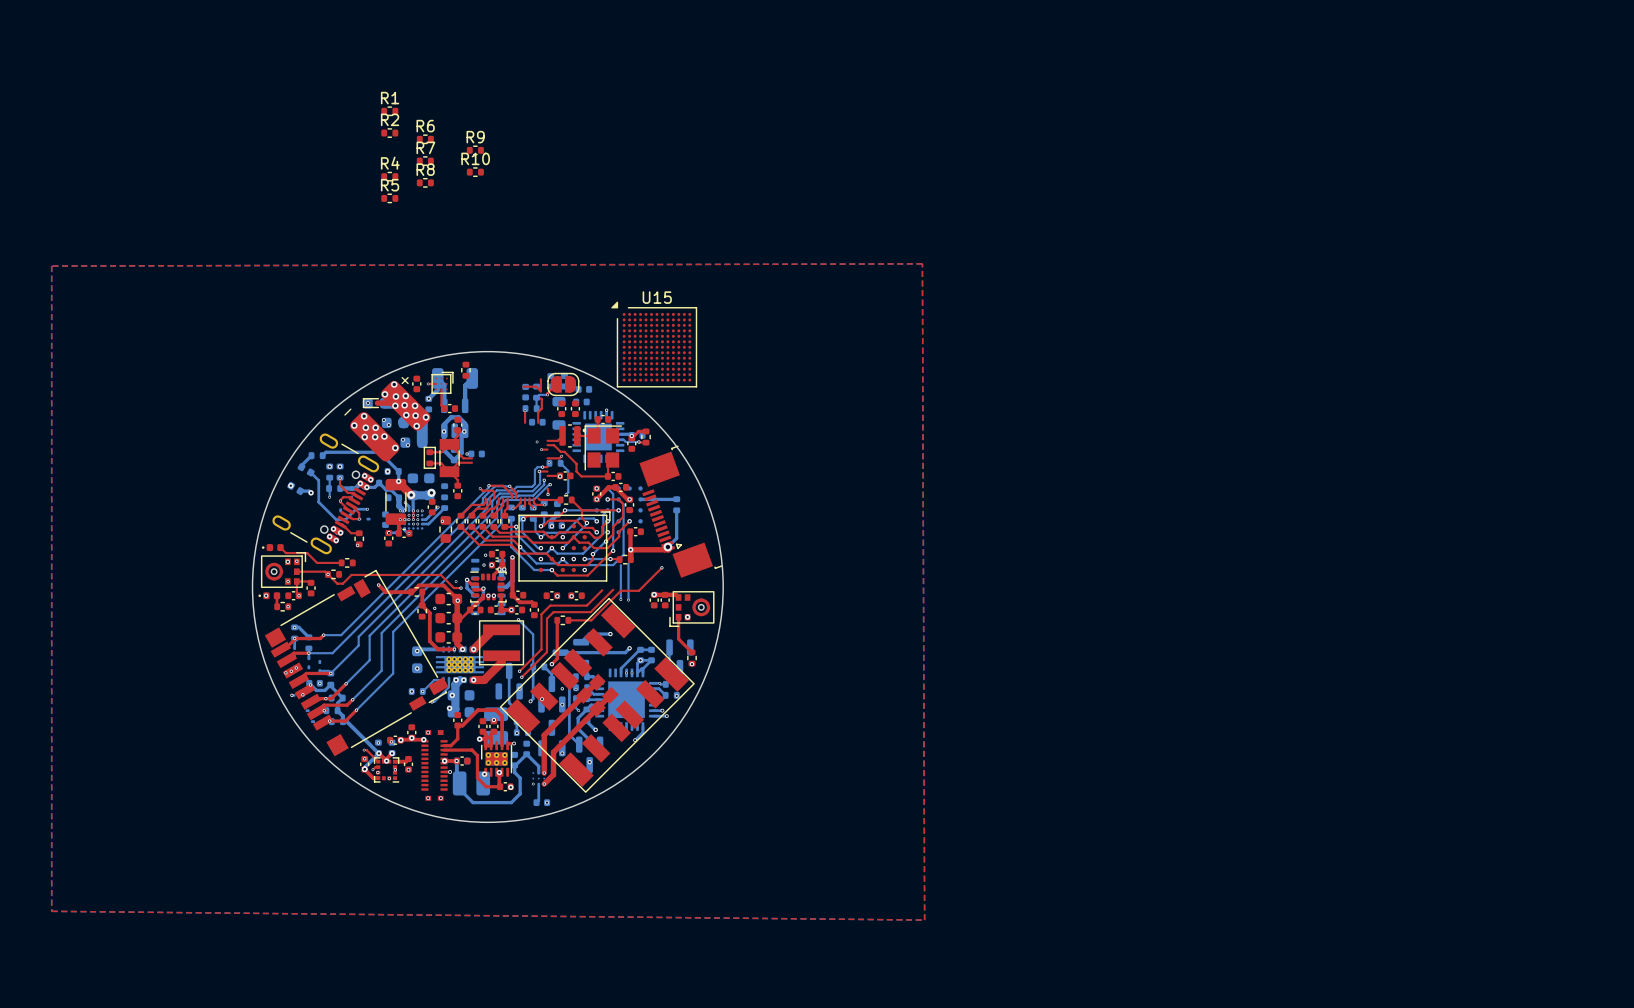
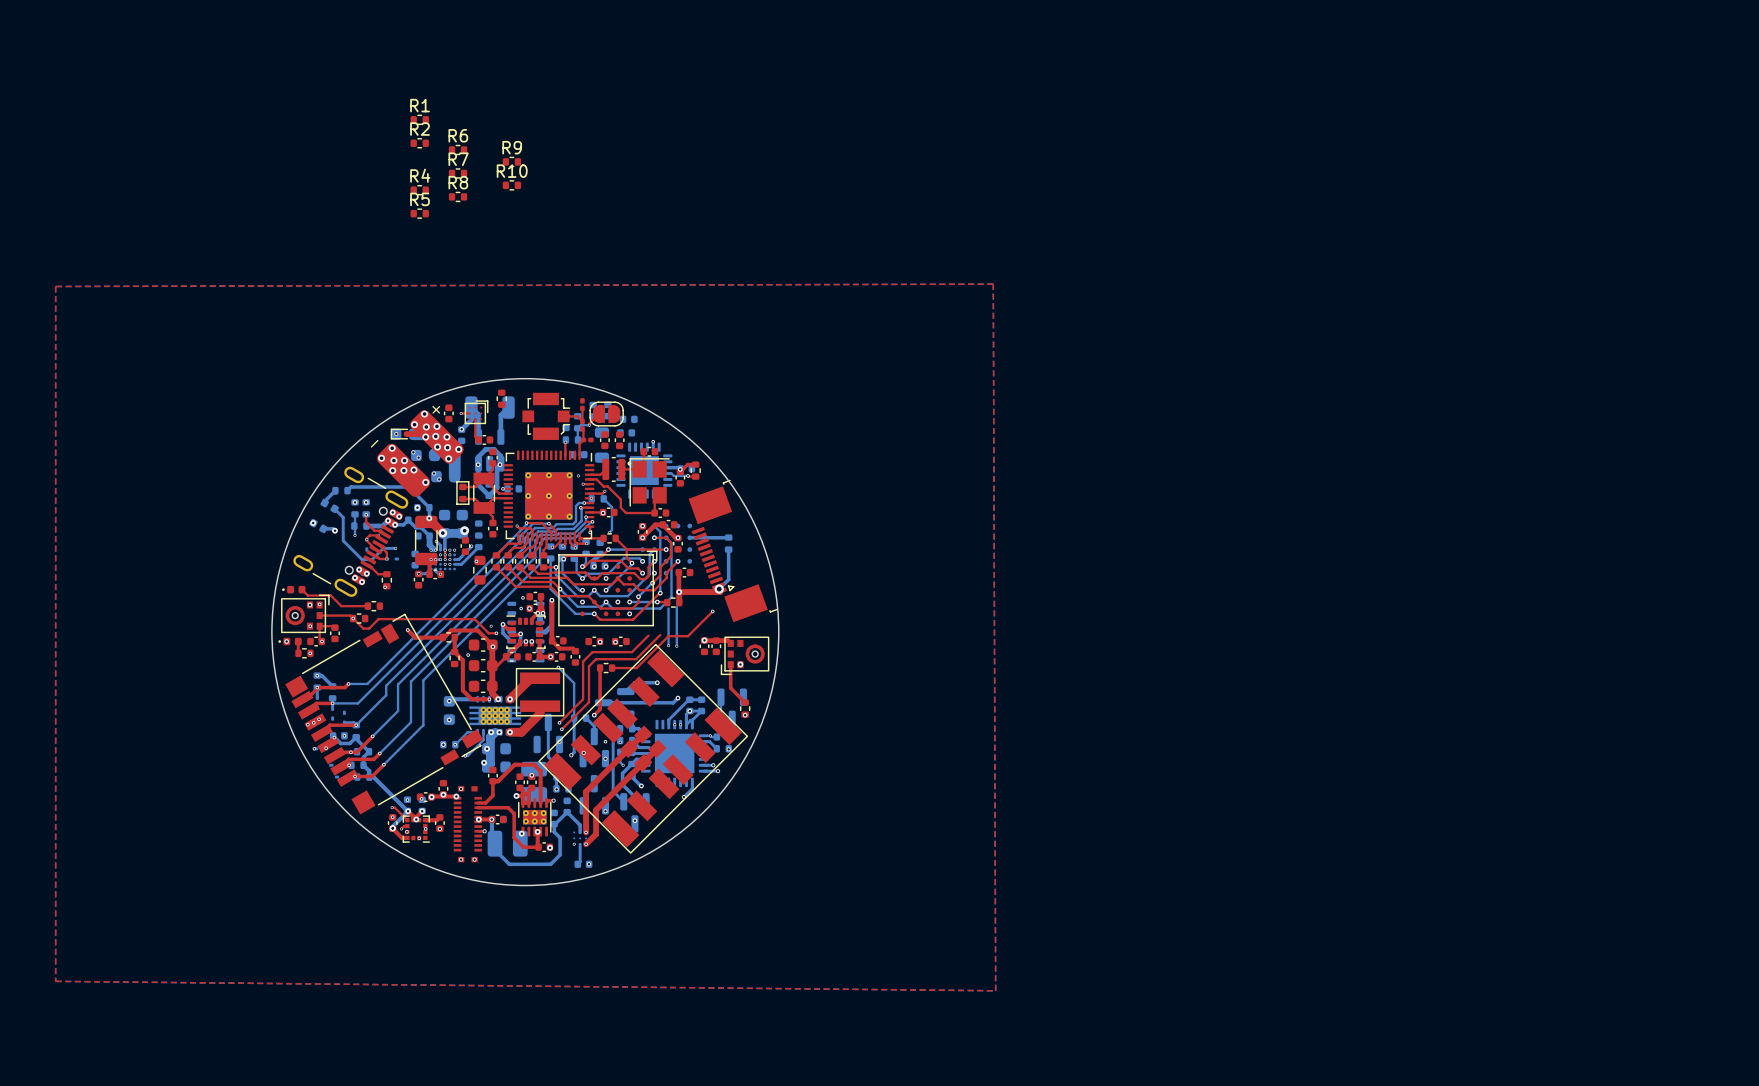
U15: (654, 344) -> none
part: none -> (582, 404)
part: none -> (546, 416)
part: none -> (582, 425)
part: none -> (587, 439)
part: none -> (548, 495)

